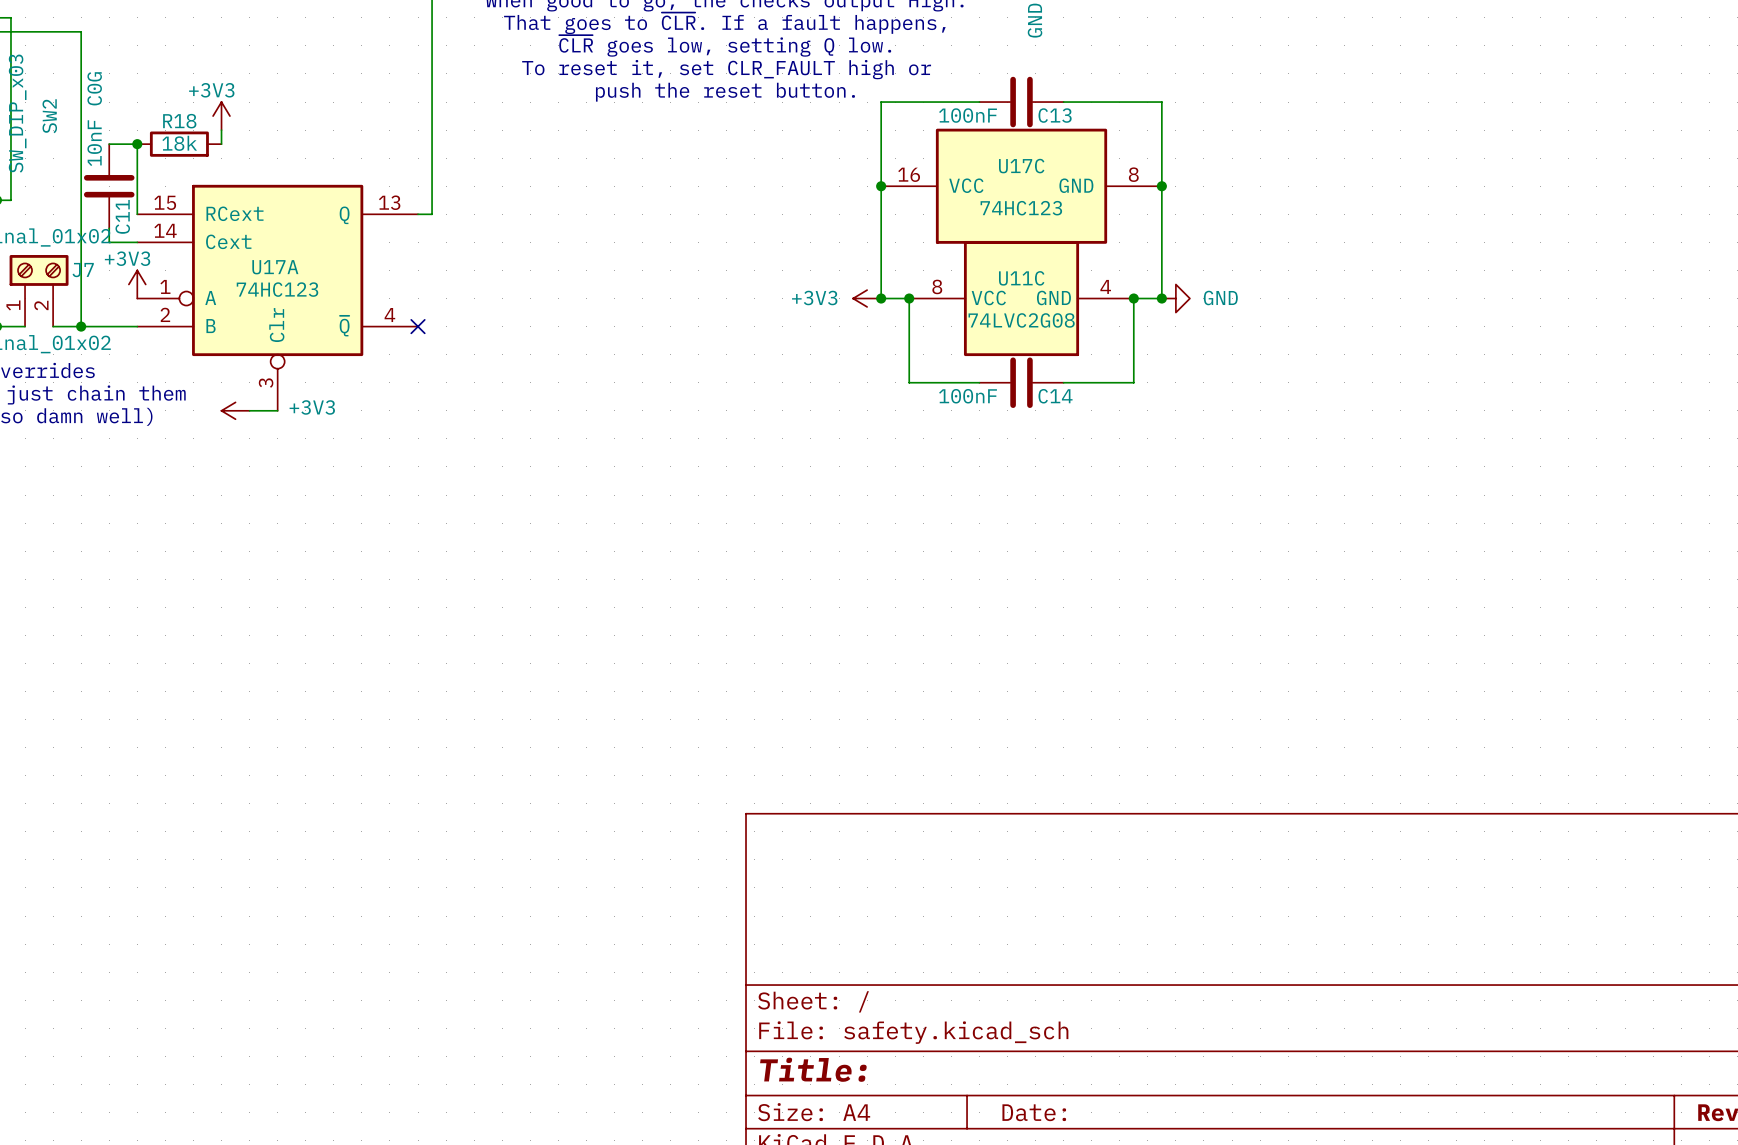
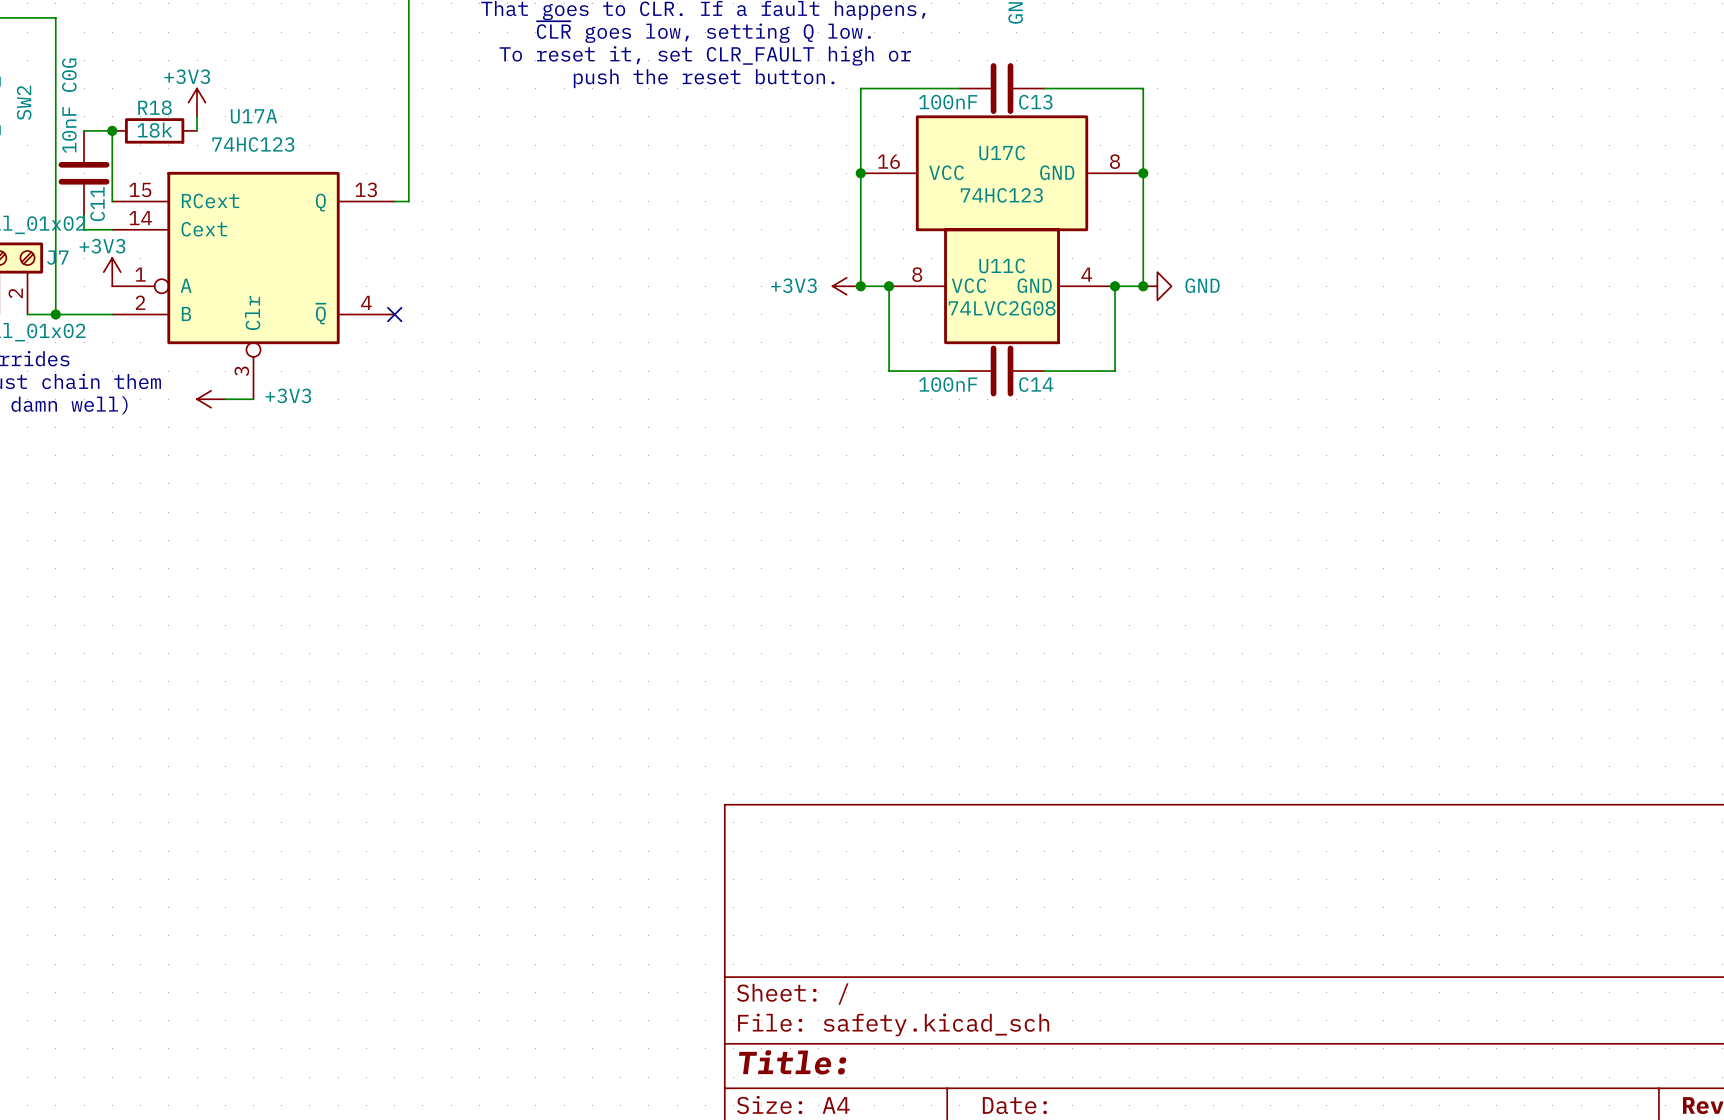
U17A name position: U17A (275, 267) -> U17A (254, 116)
U17A value position: 74HC123 (277, 289) -> 74HC123 (253, 144)

